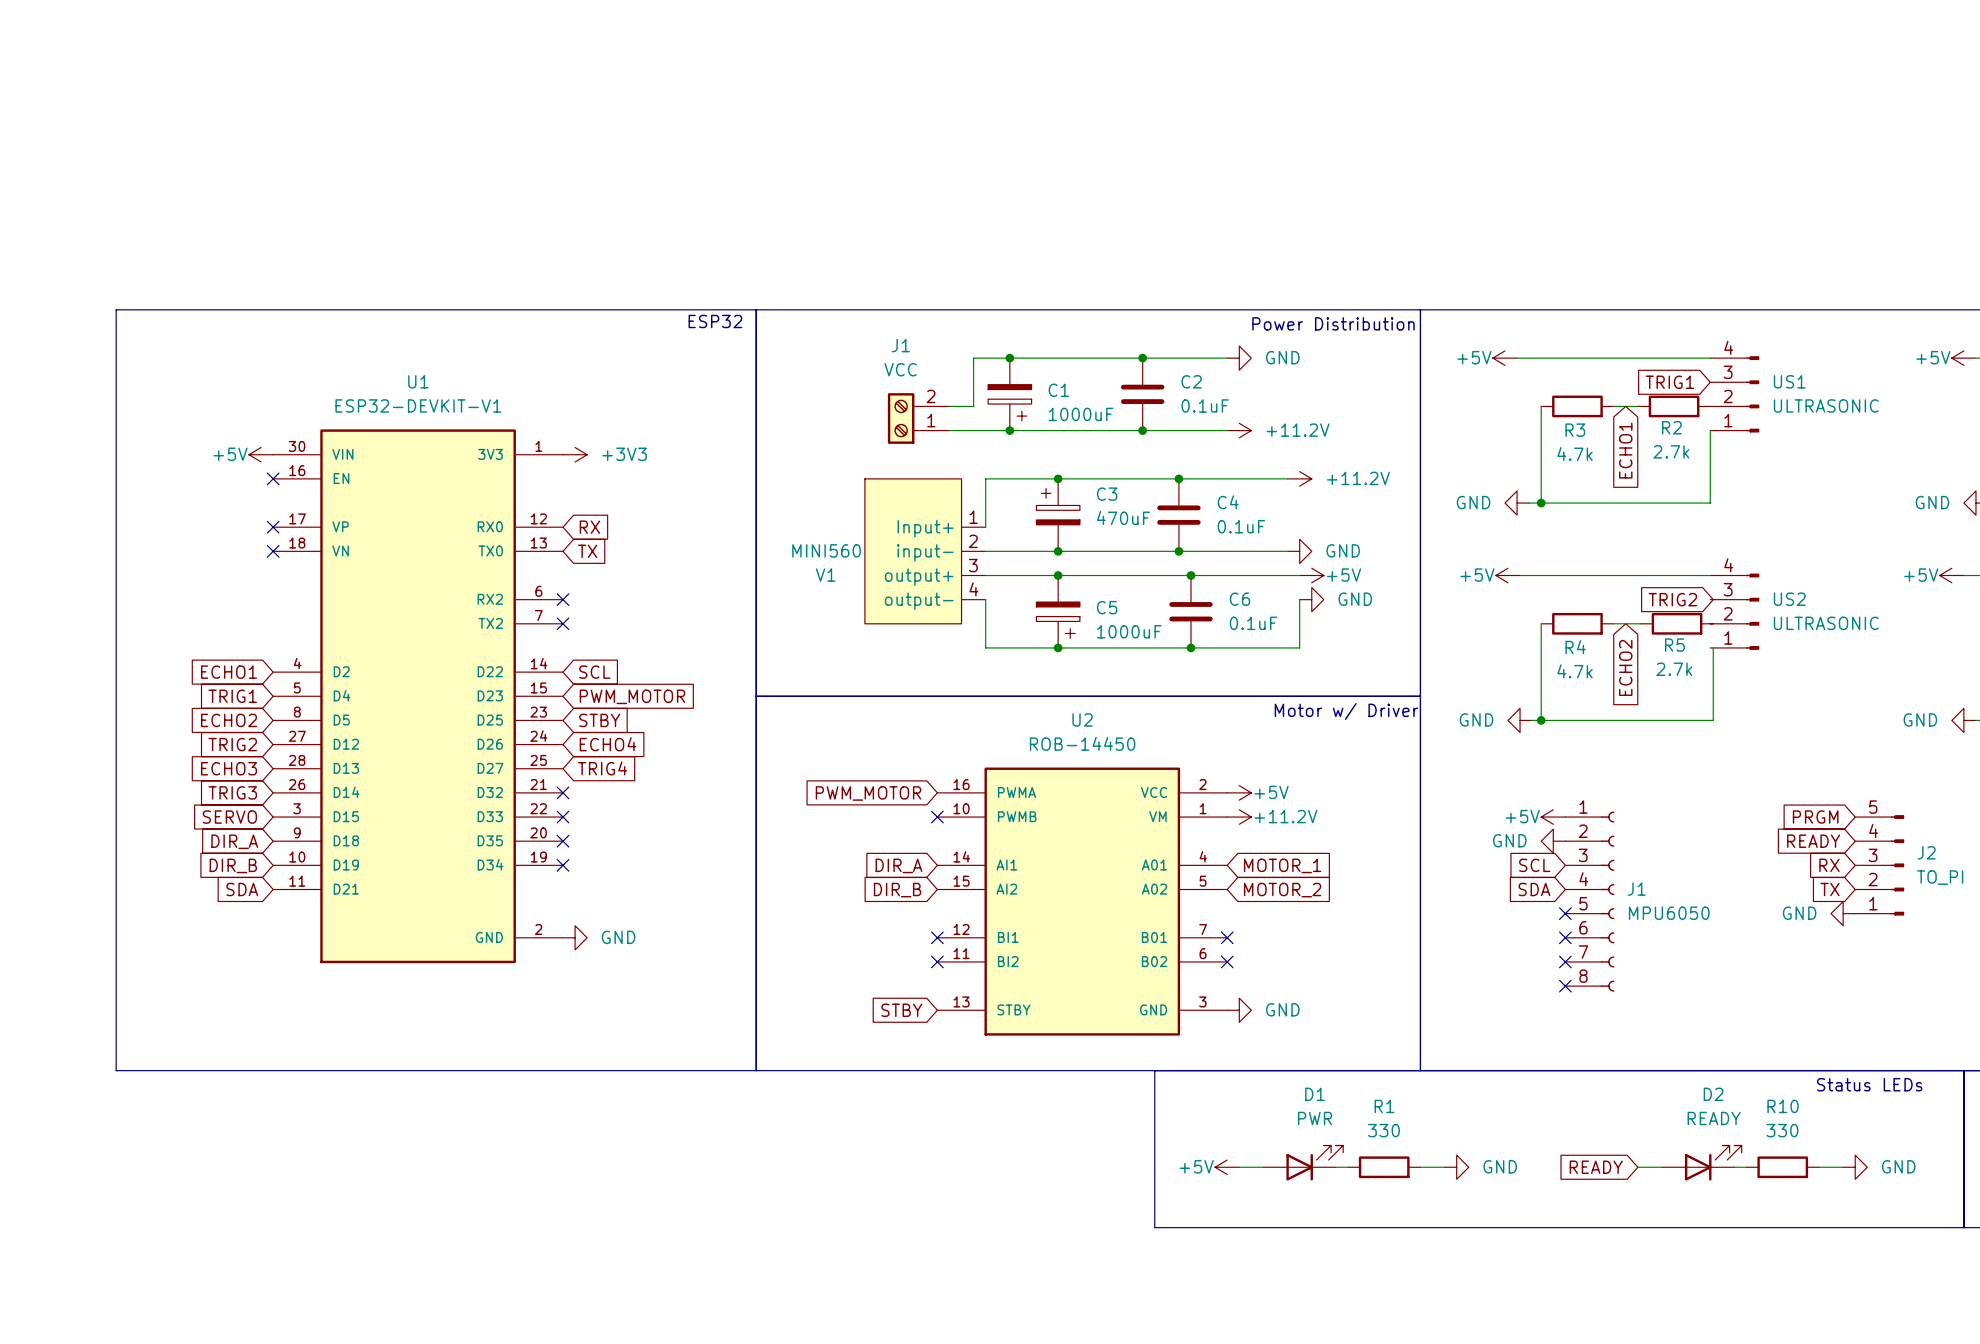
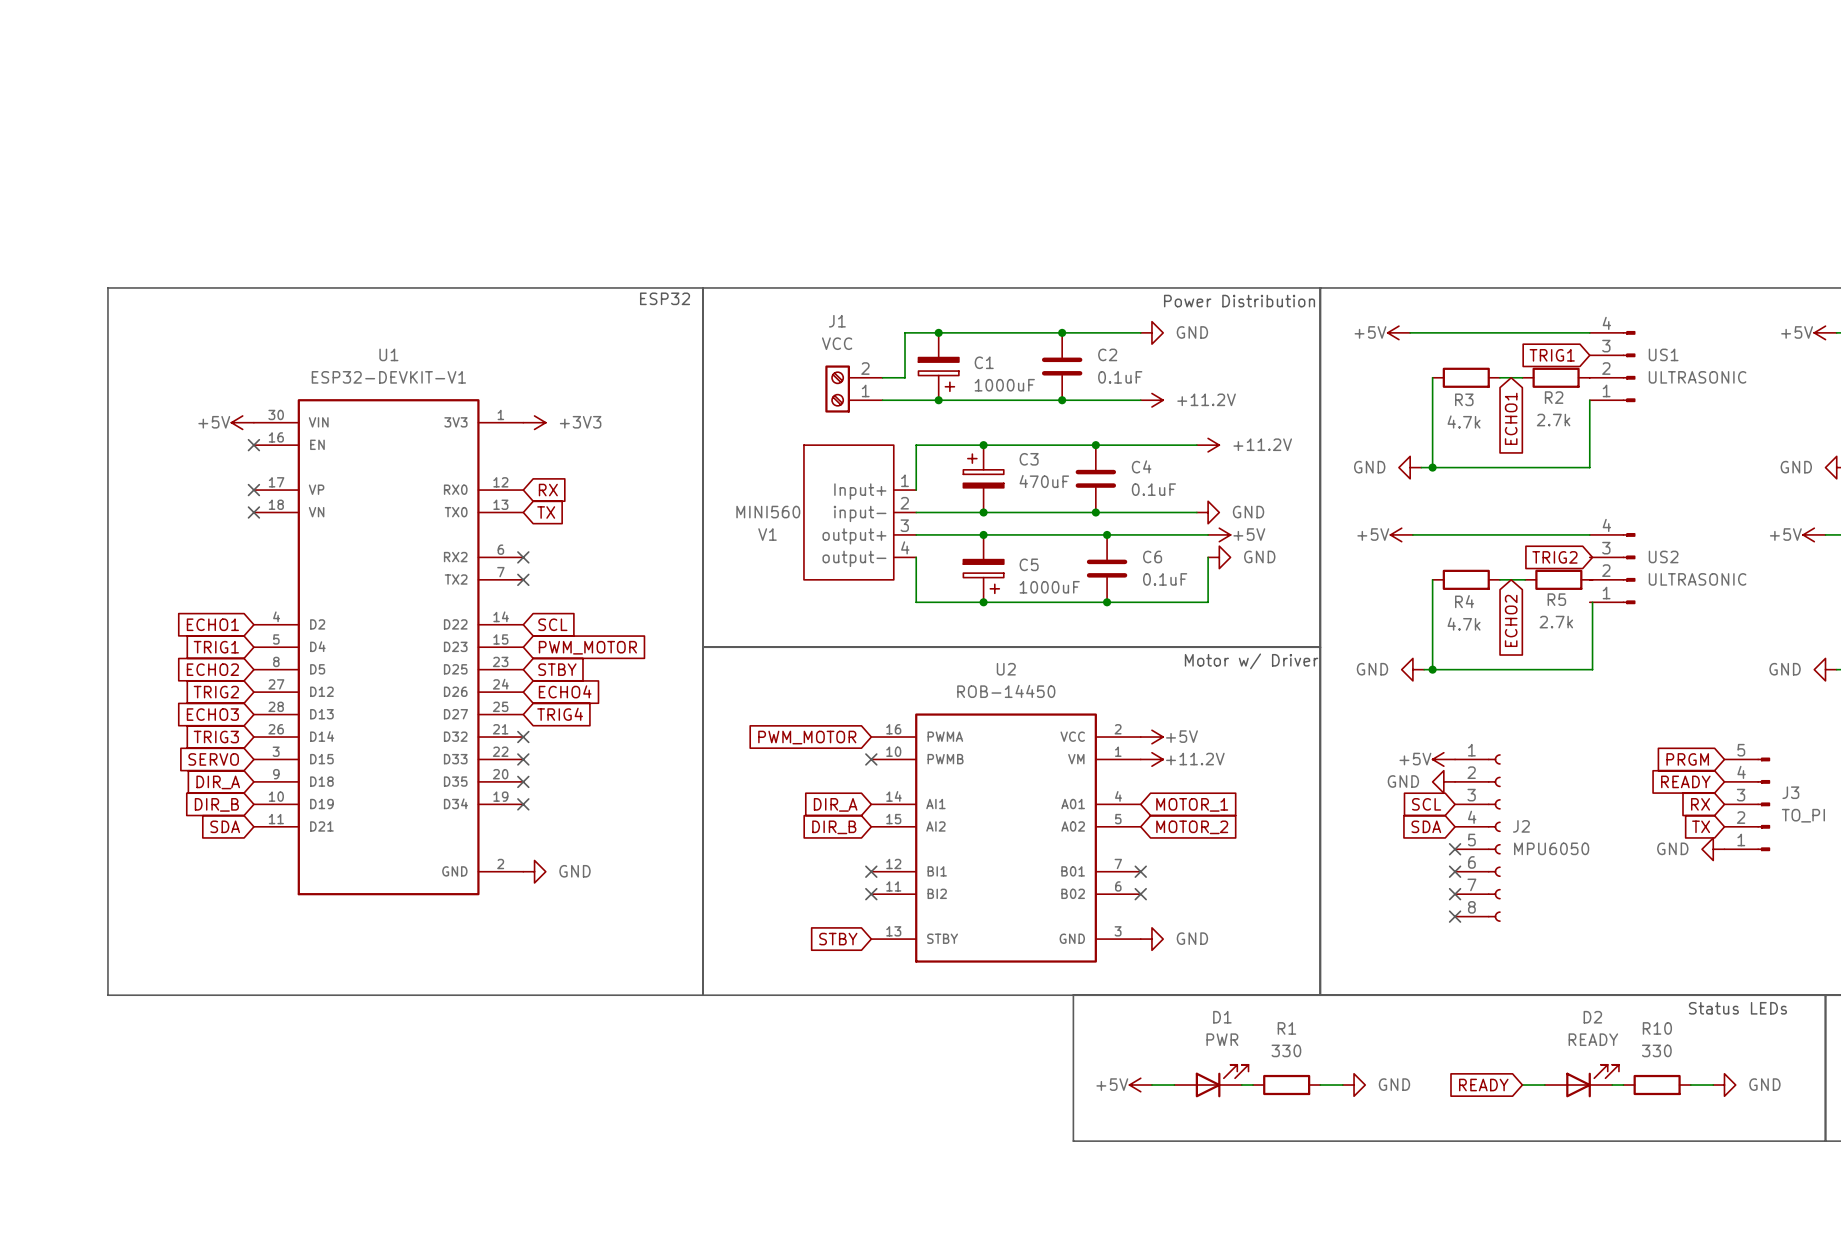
J2 name: J2 (1926, 852) -> J3 (1790, 792)
J1 name: J1 (1636, 889) -> J2 (1521, 826)

